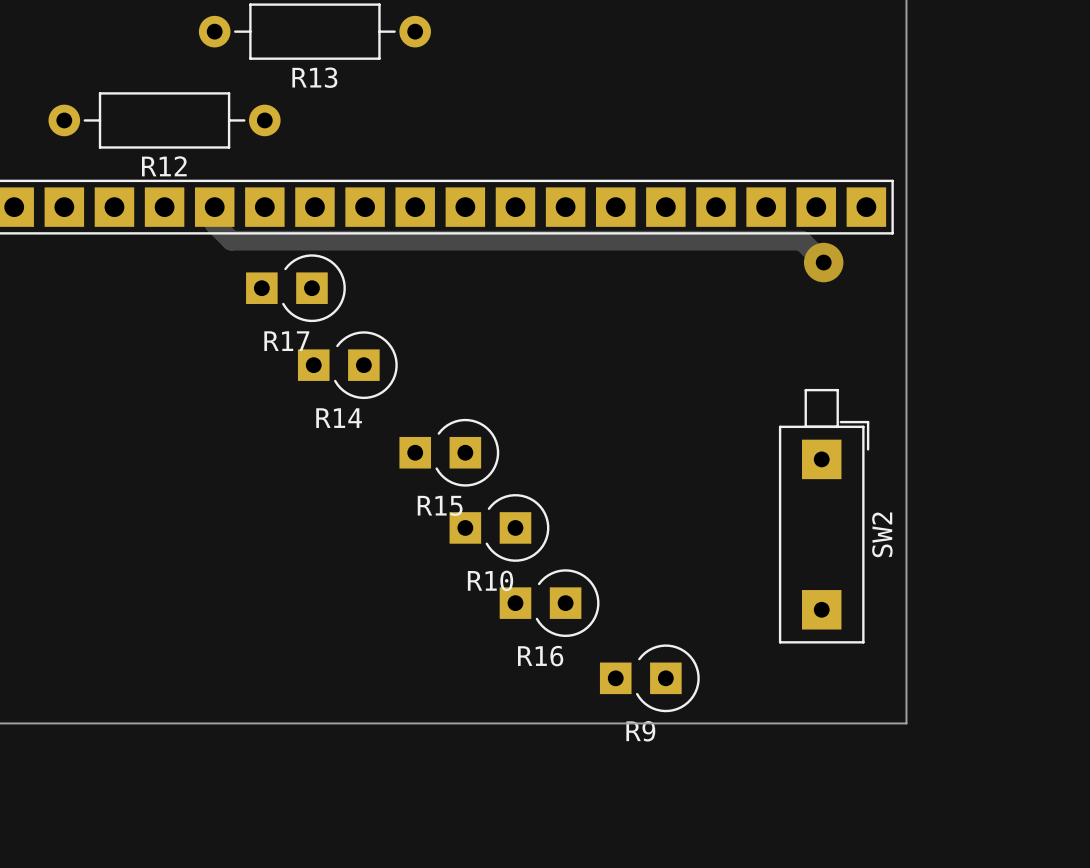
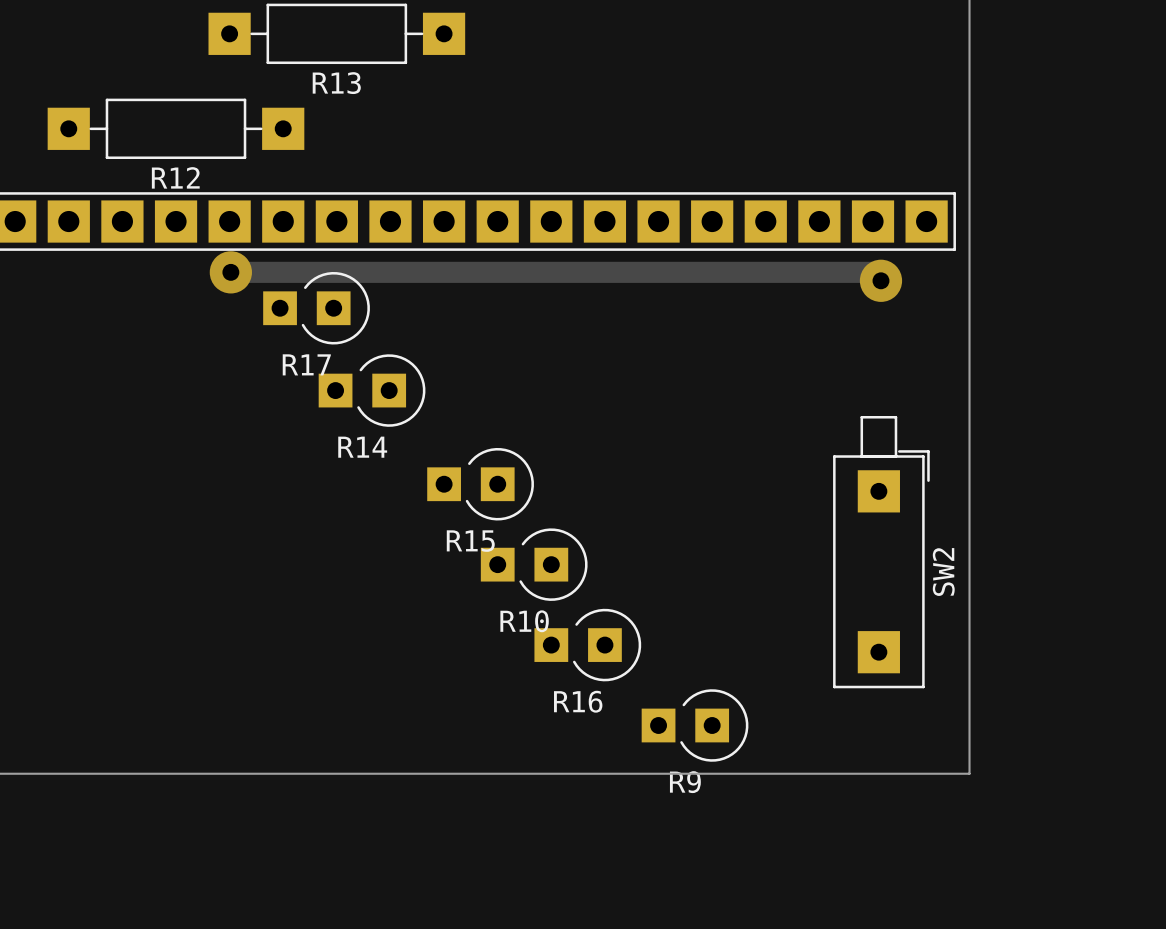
R13 footprint: [198, 3, 431, 60] -> [208, 3, 466, 65]
R12 footprint: [48, 92, 281, 149] -> [47, 98, 305, 160]
track: (214, 207) (214, 224) (231, 240) (801, 240) (815, 254) -> (230, 272) (872, 272)
via: none -> (230, 272)

